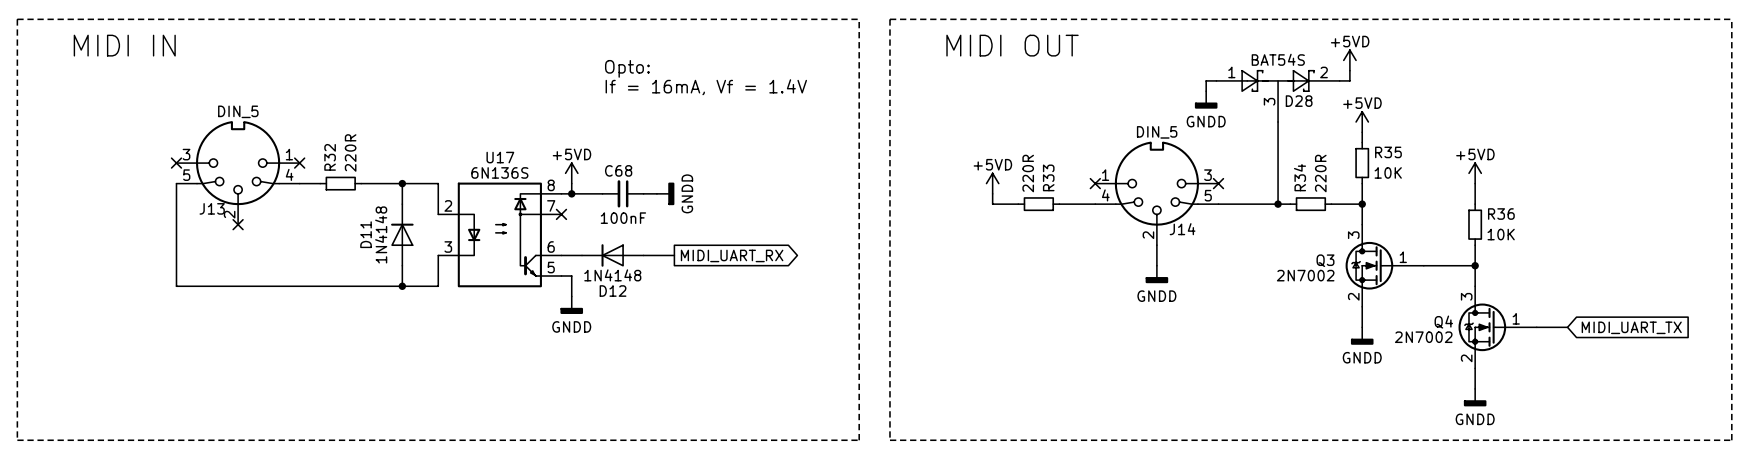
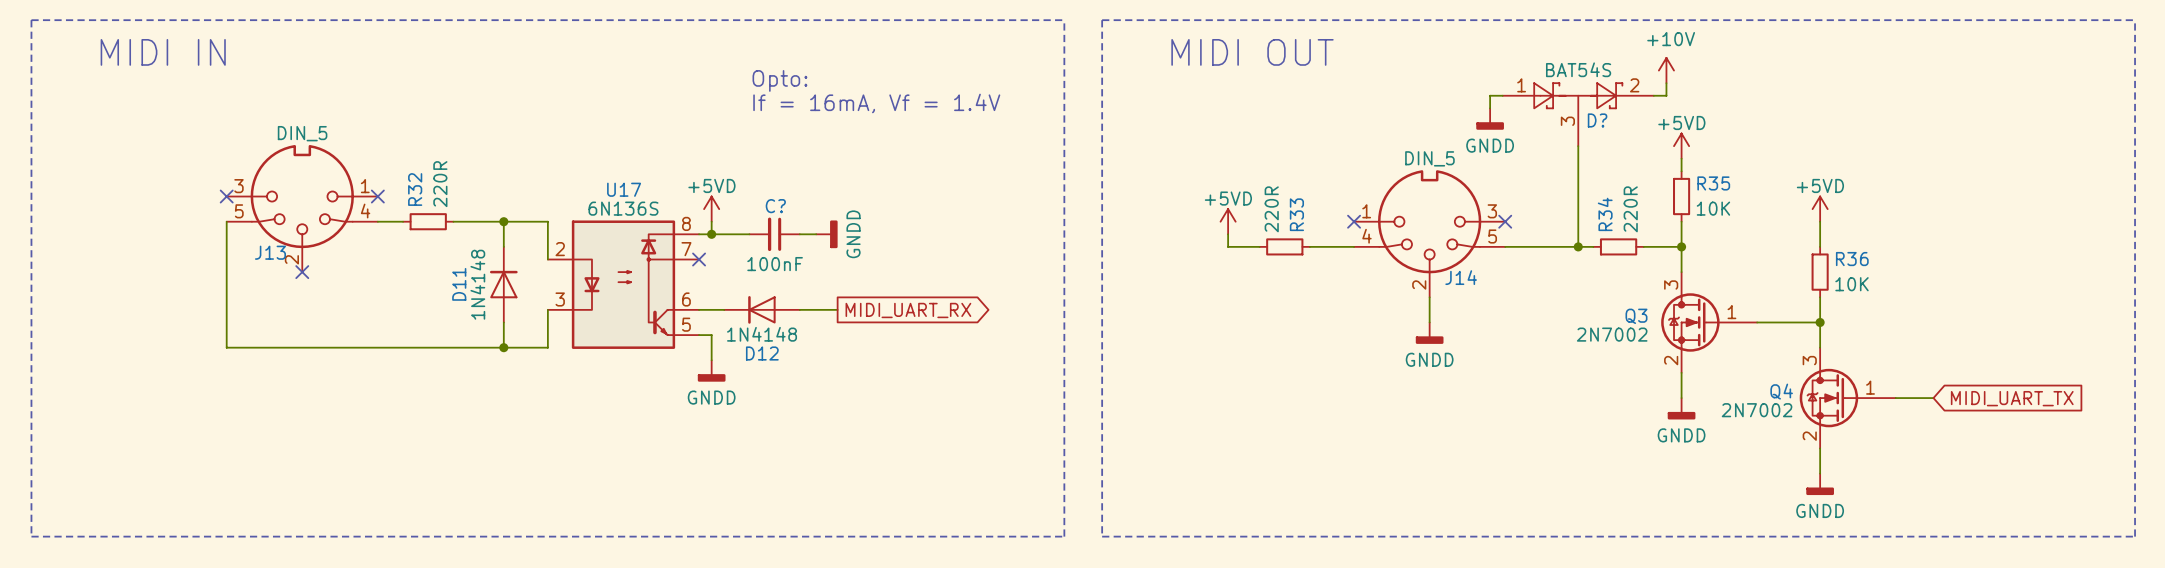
power symbol: +5VD (1349, 60) -> +10V (1666, 70)
D28 name: D28 (1299, 101) -> D? (1597, 120)
C68 name: C68 (618, 170) -> C? (775, 206)

